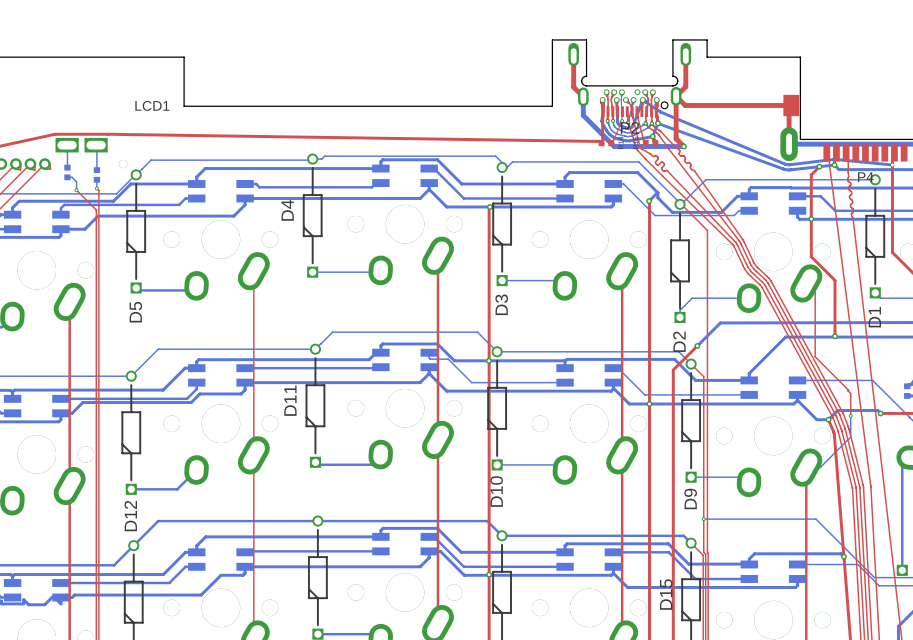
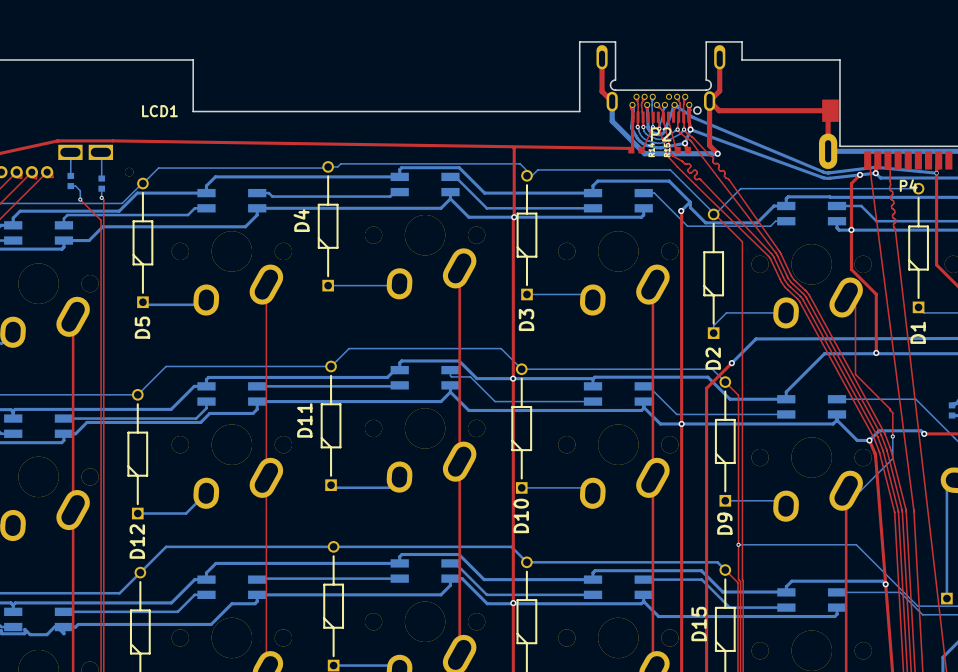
top track: none -> (513, 147) (514, 217)

